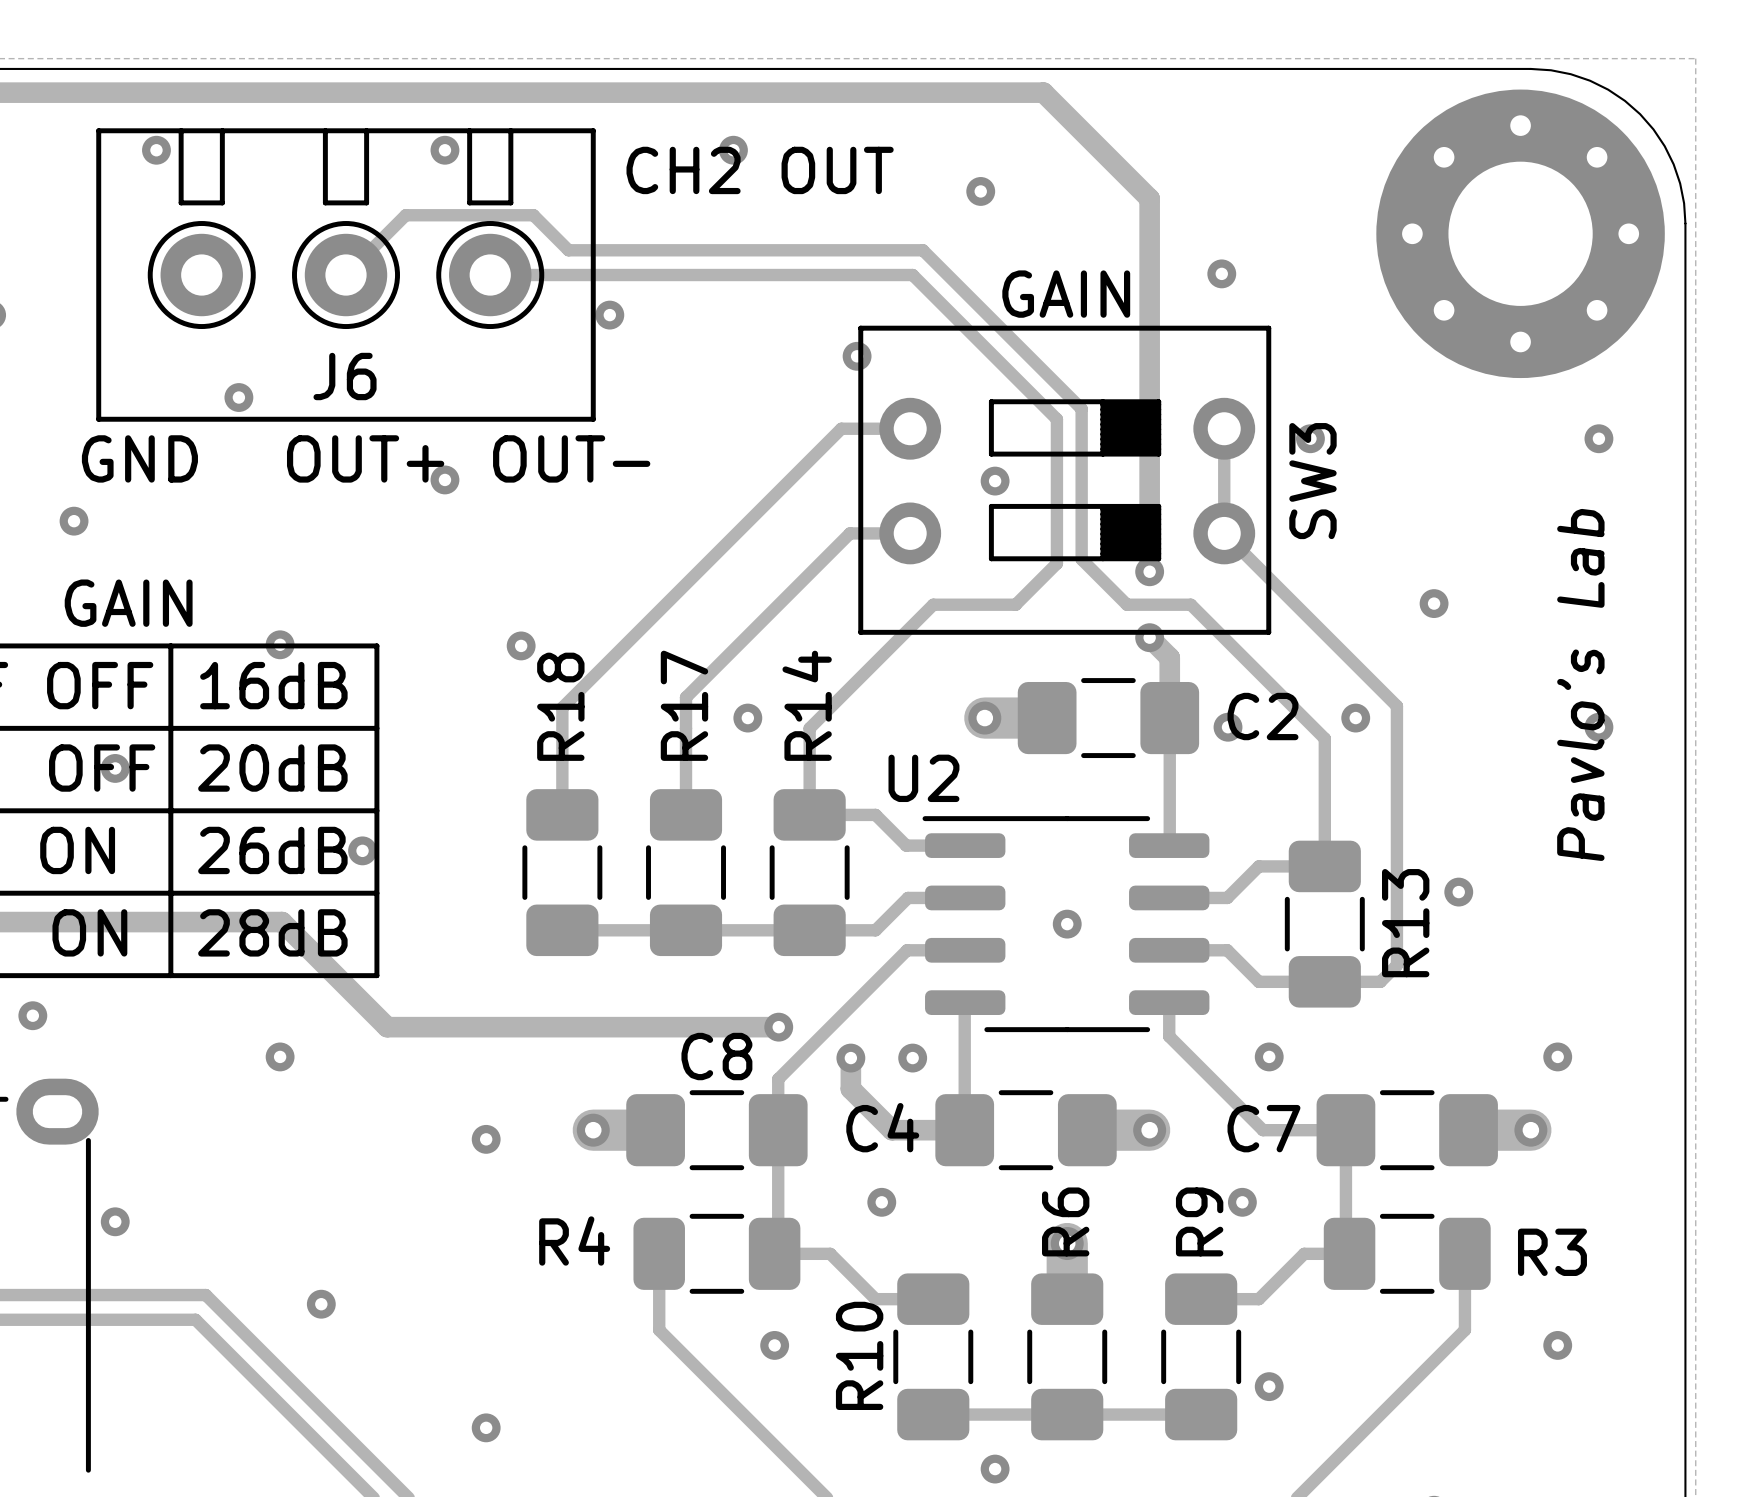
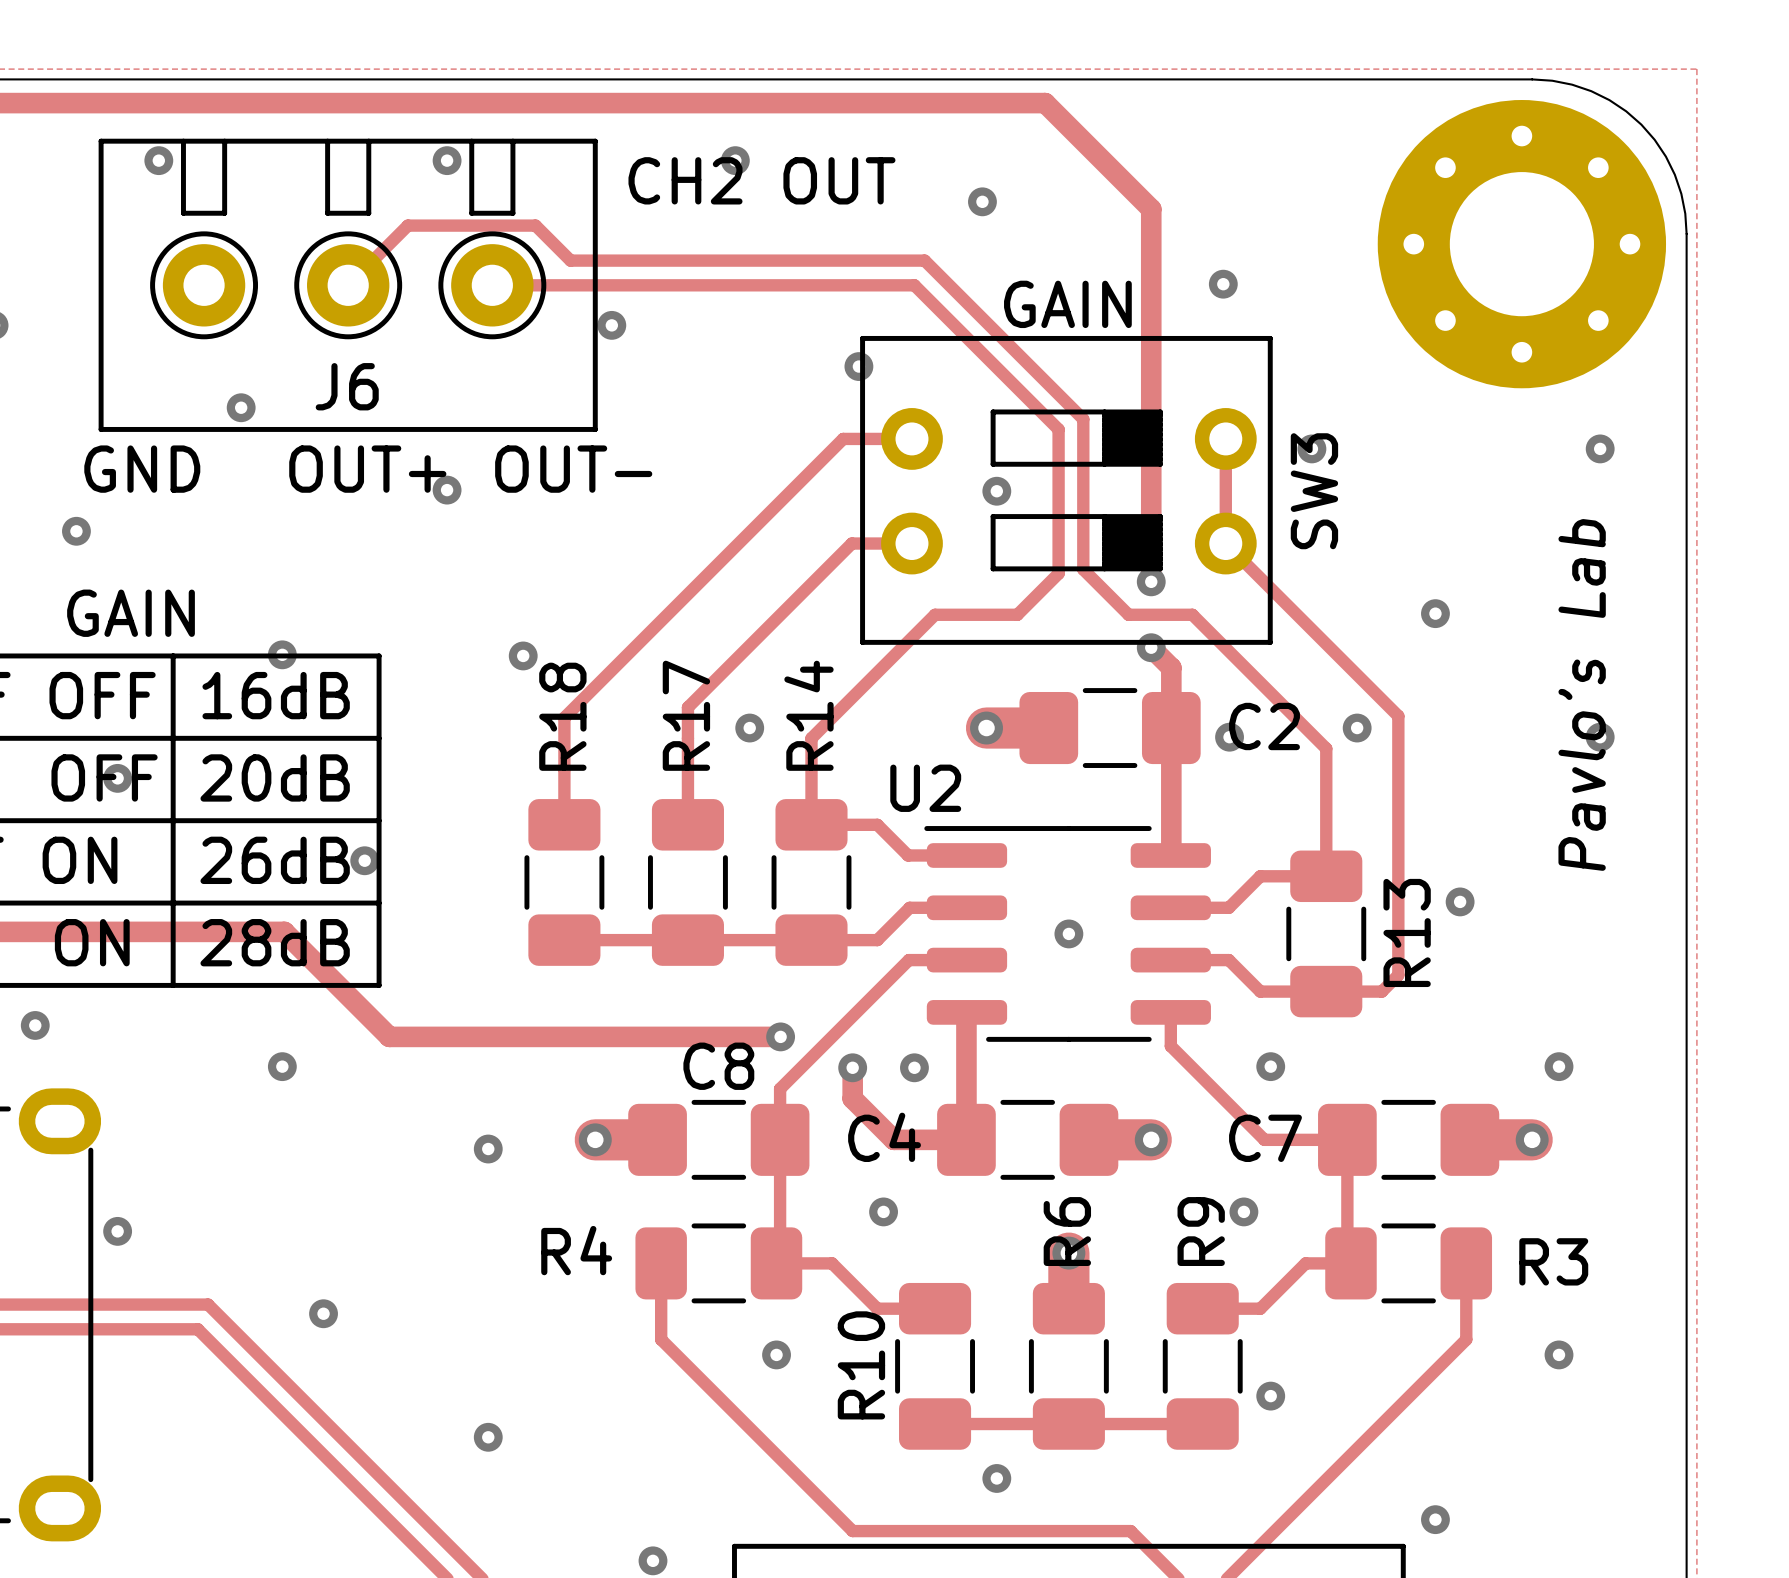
track width: thin (1169, 718) (1169, 845) -> thick (1171, 728) (1171, 854)
track width: thin (964, 1003) (964, 1130) -> thick (966, 1012) (966, 1139)

